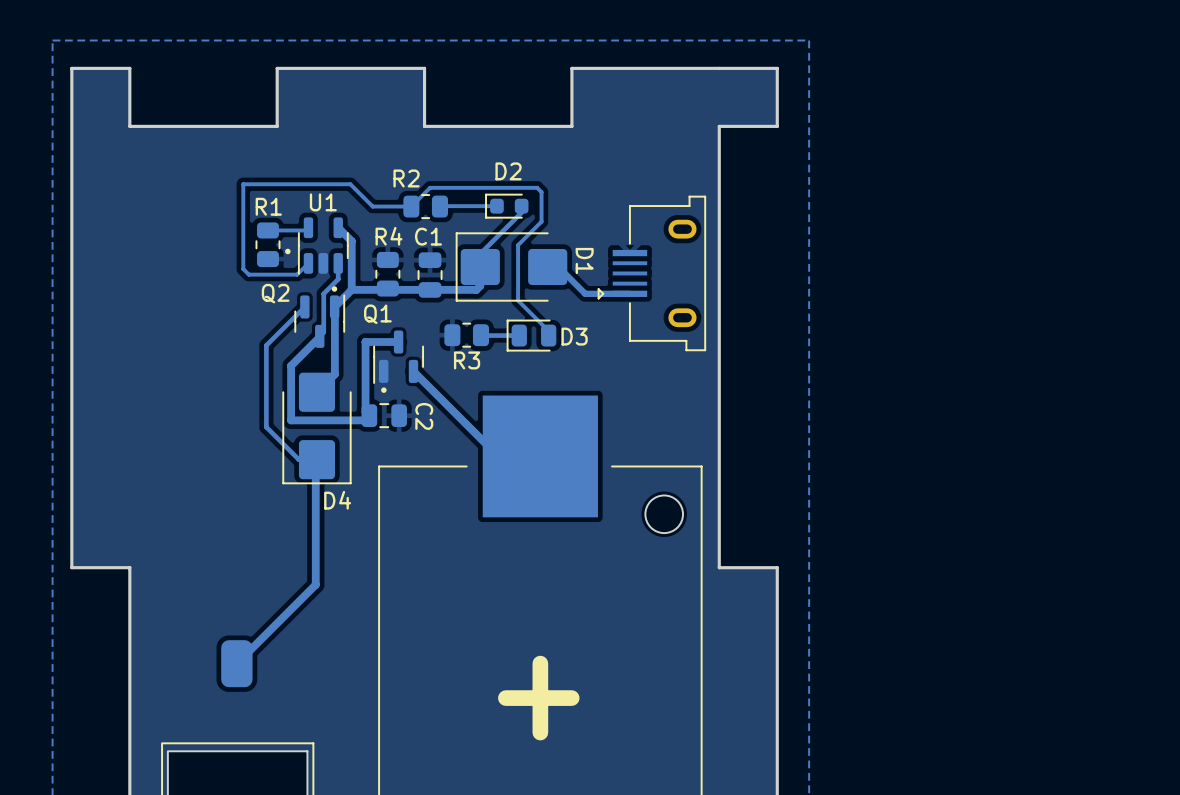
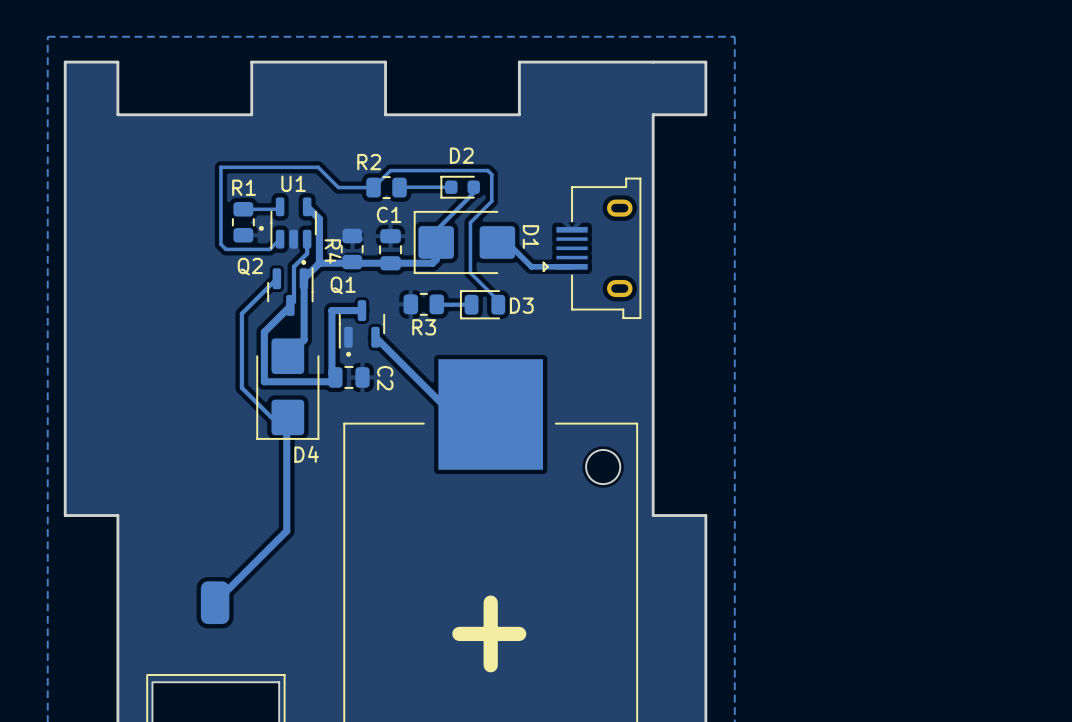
R4 name rotation: 0° (388, 236) -> 90° clockwise (333, 251)
R4 name position: R4 (388, 236) -> R4 (333, 251)

